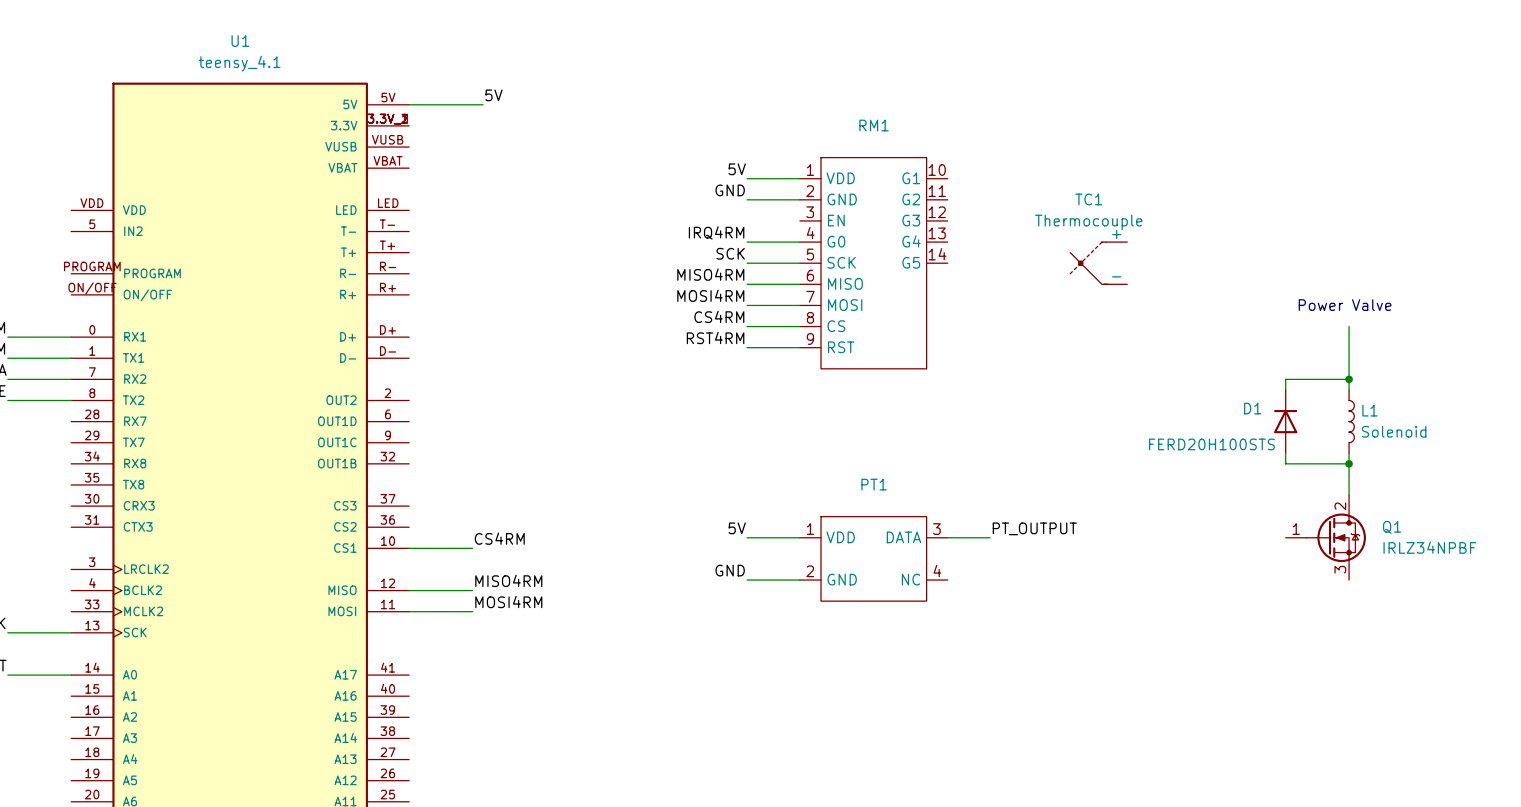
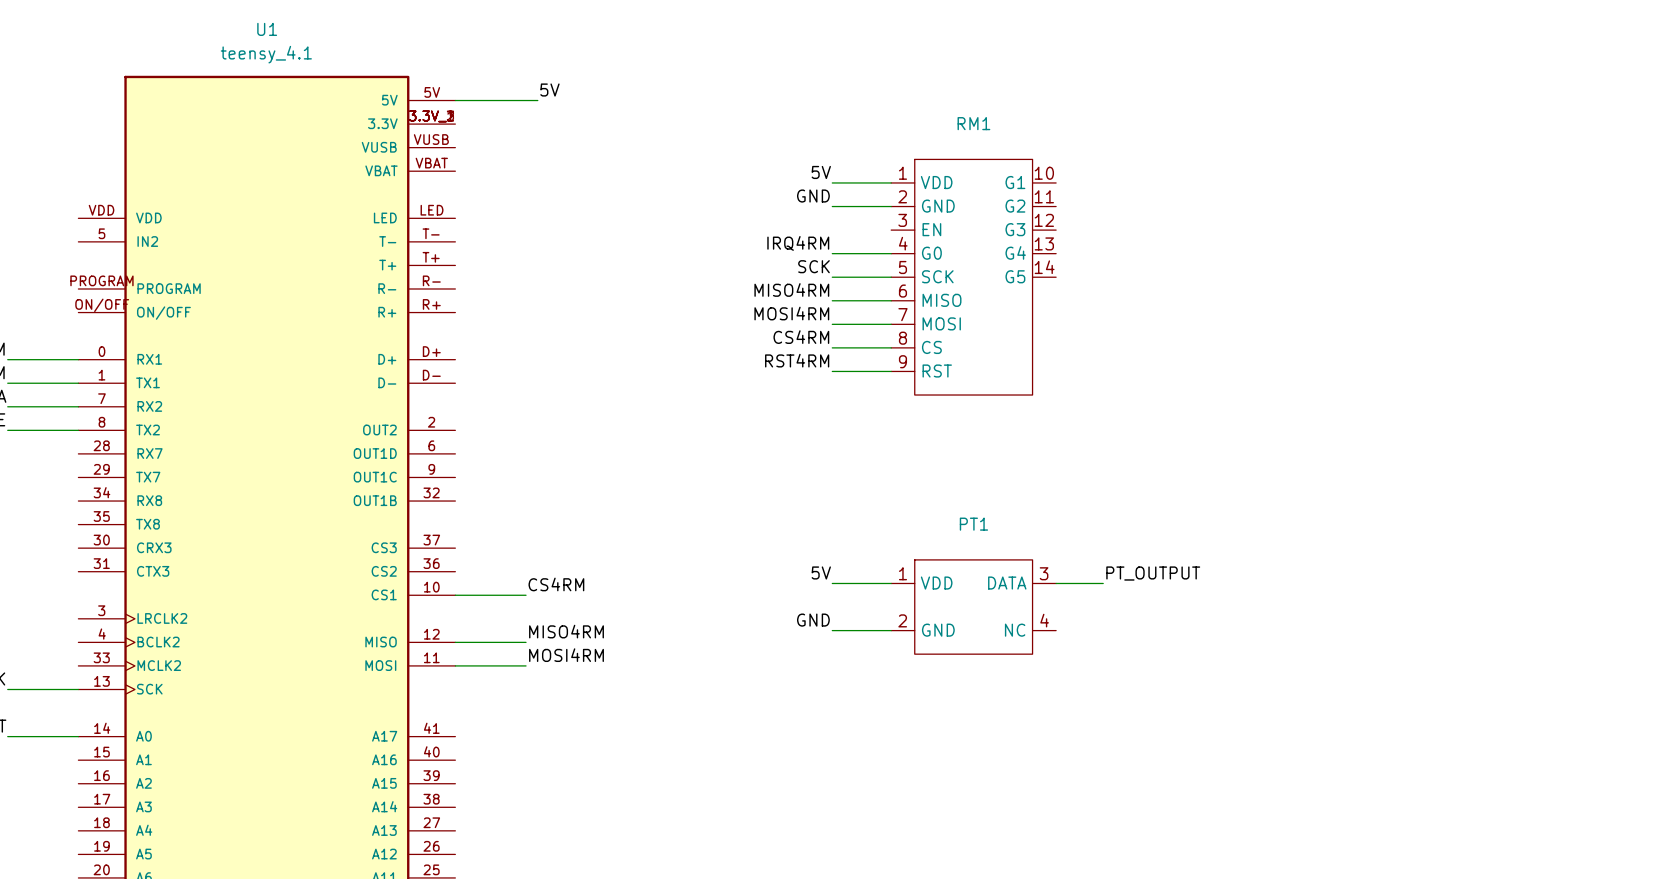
TC1: Thermocouple (1098, 263) -> none
text: Power Valve (1345, 305) -> none
wire: (1349, 326) (1349, 389) -> none
wire: (1349, 379) (1285, 379) (1285, 389) -> none
junction: (1349, 379) -> none
D1: FERD20H100STS (1285, 421) -> none
L1: Solenoid (1351, 421) -> none
wire: (1285, 453) (1285, 463) (1349, 463) -> none
wire: (1349, 453) (1349, 495) -> none
junction: (1349, 463) -> none
Q1: IRLZ34NPBF (1325, 537) -> none

